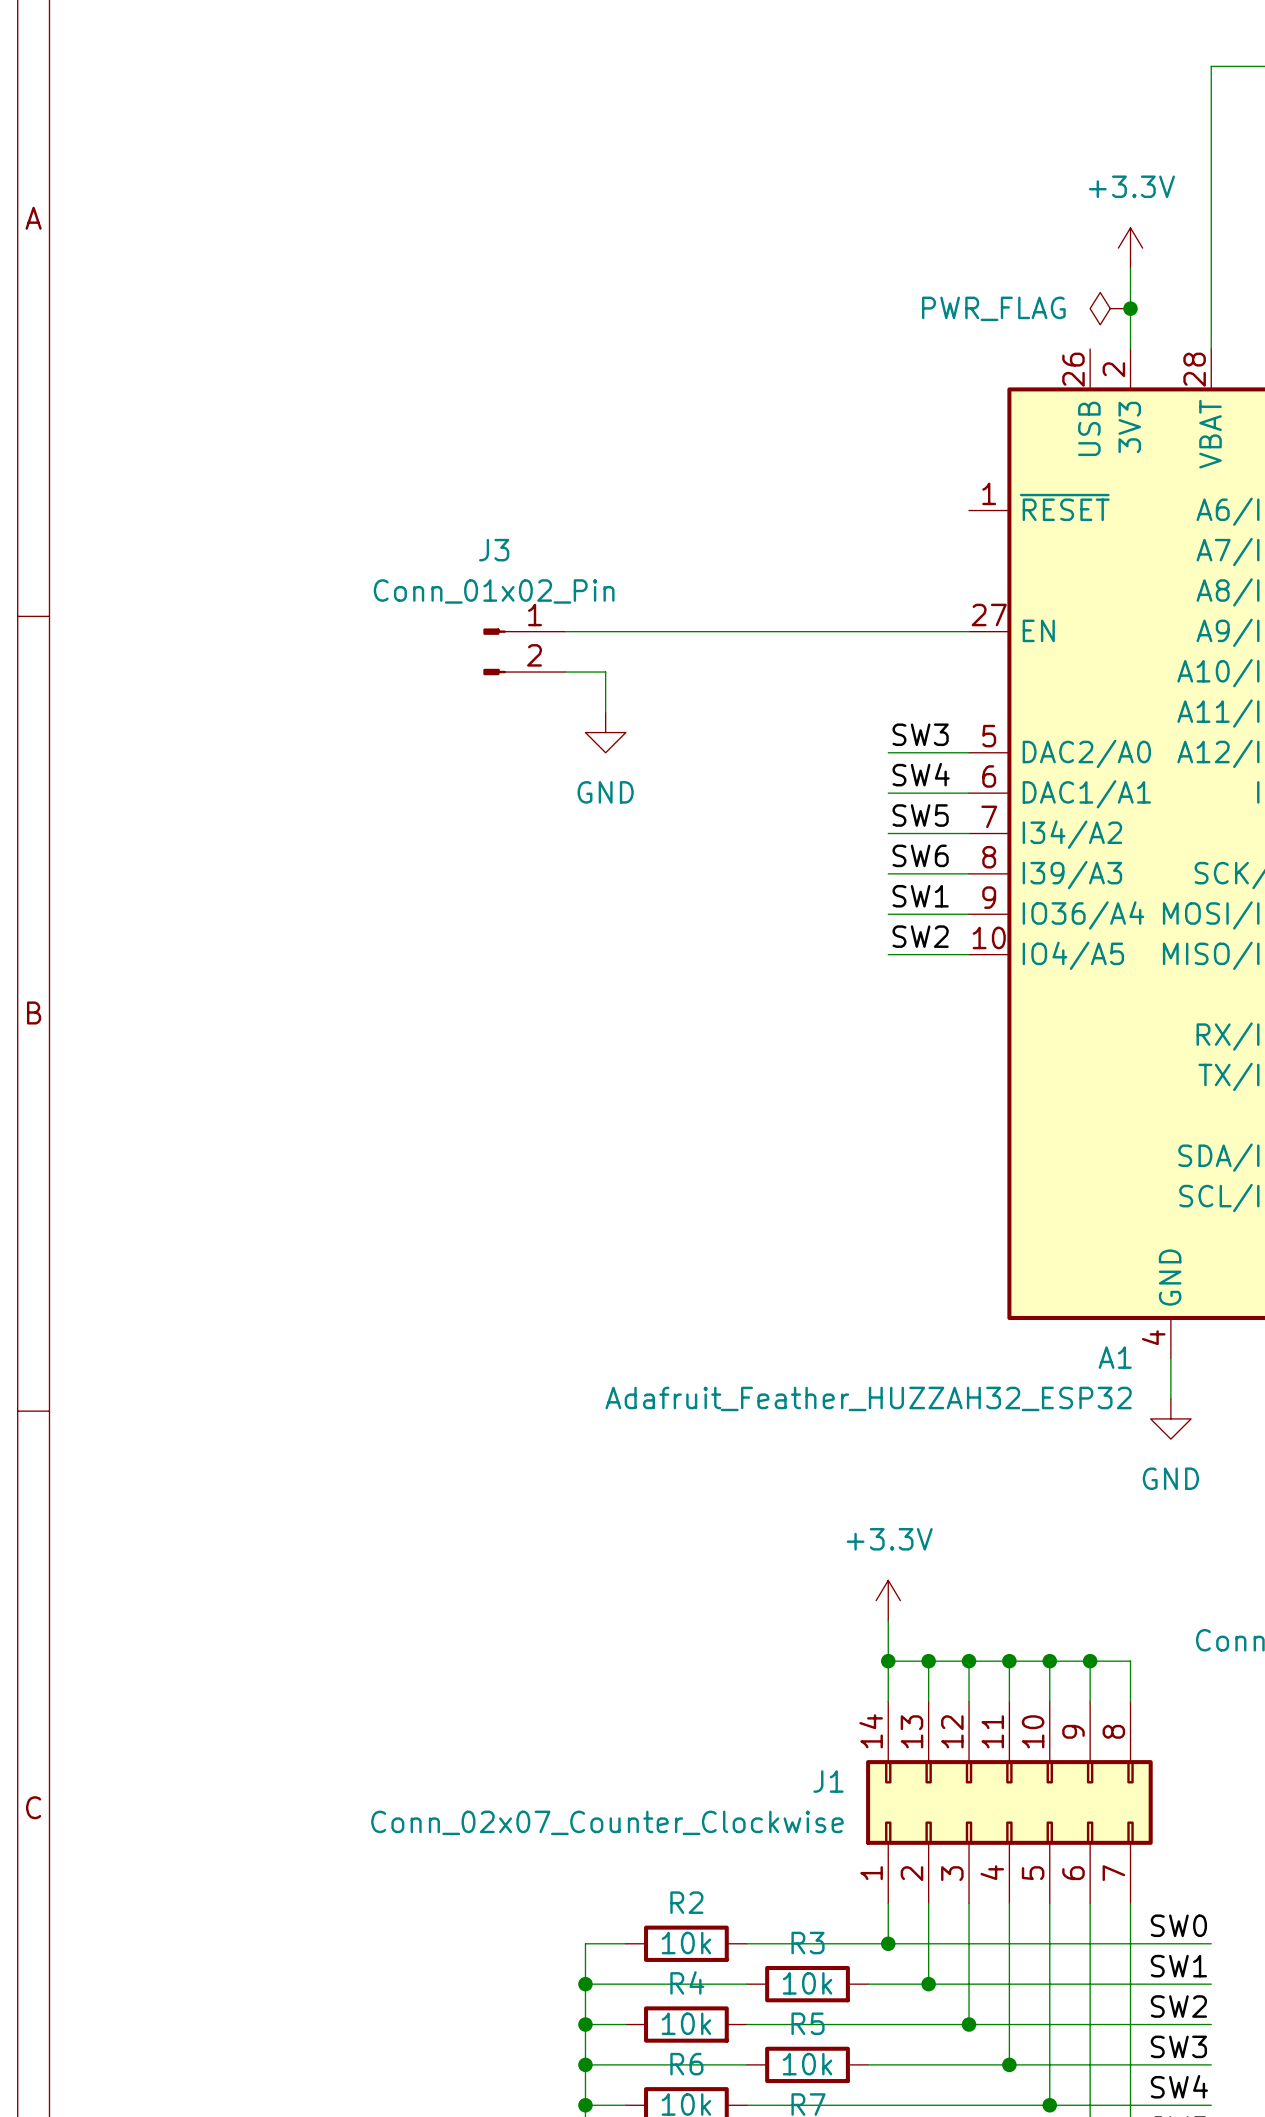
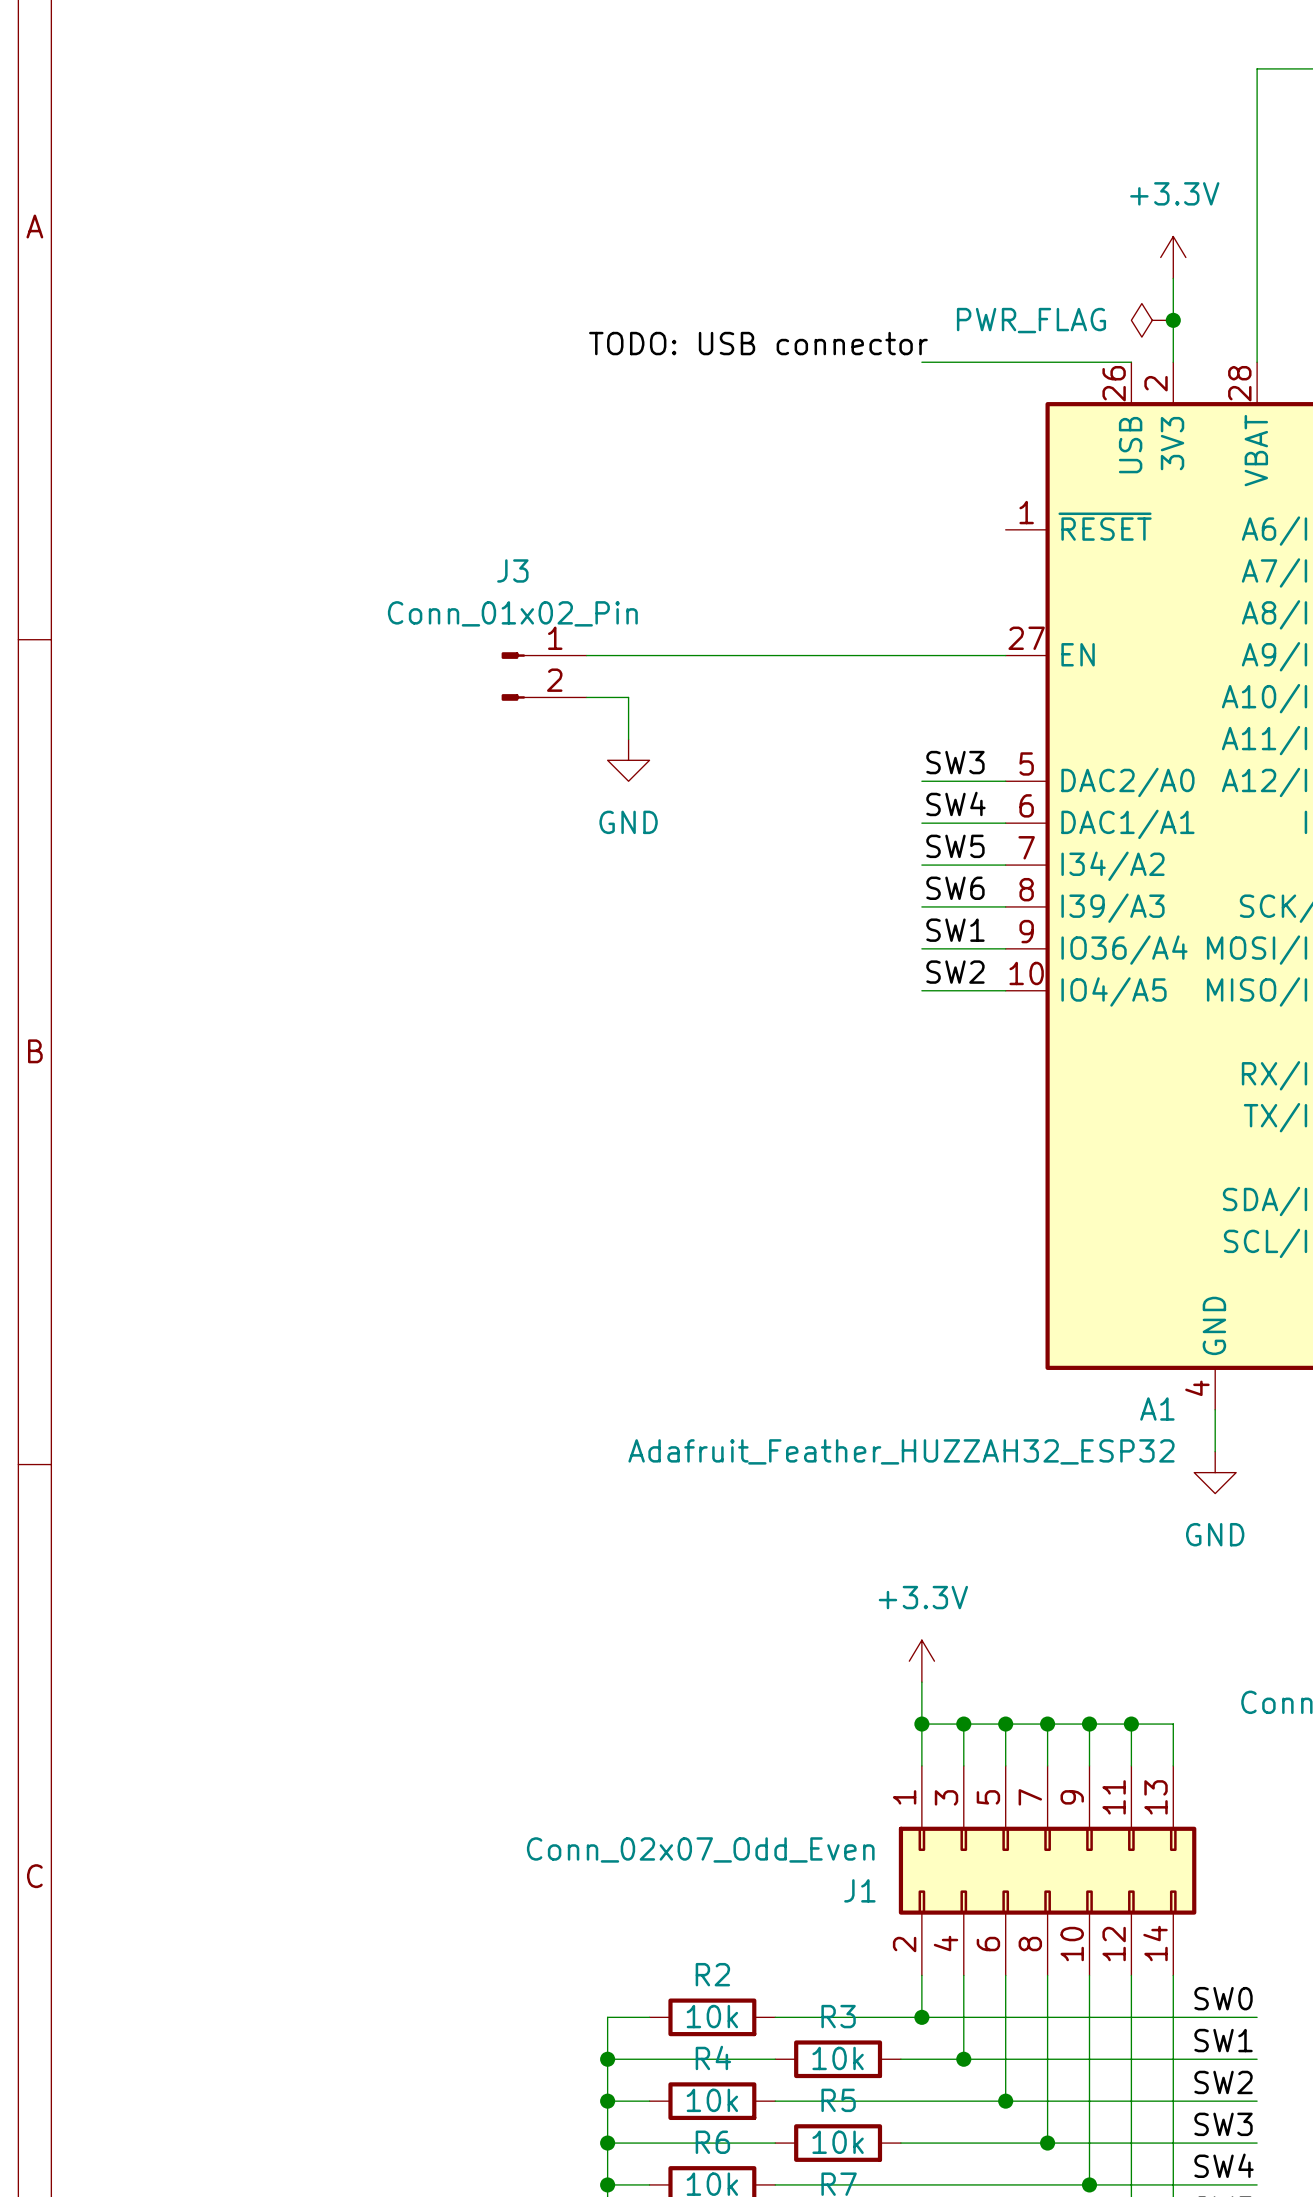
label: none -> TODO: USB connector (758, 343)
wire: none -> (921, 362) (1131, 362)
J1 symbol: [866, 1701, 1153, 1904] -> [898, 1765, 1197, 1976]
J1 name position: J1 (828, 1781) -> J1 (859, 1890)
J1 value: Conn_02x07_Counter_Clockwise (607, 1822) -> Conn_02x07_Odd_Even (700, 1849)

